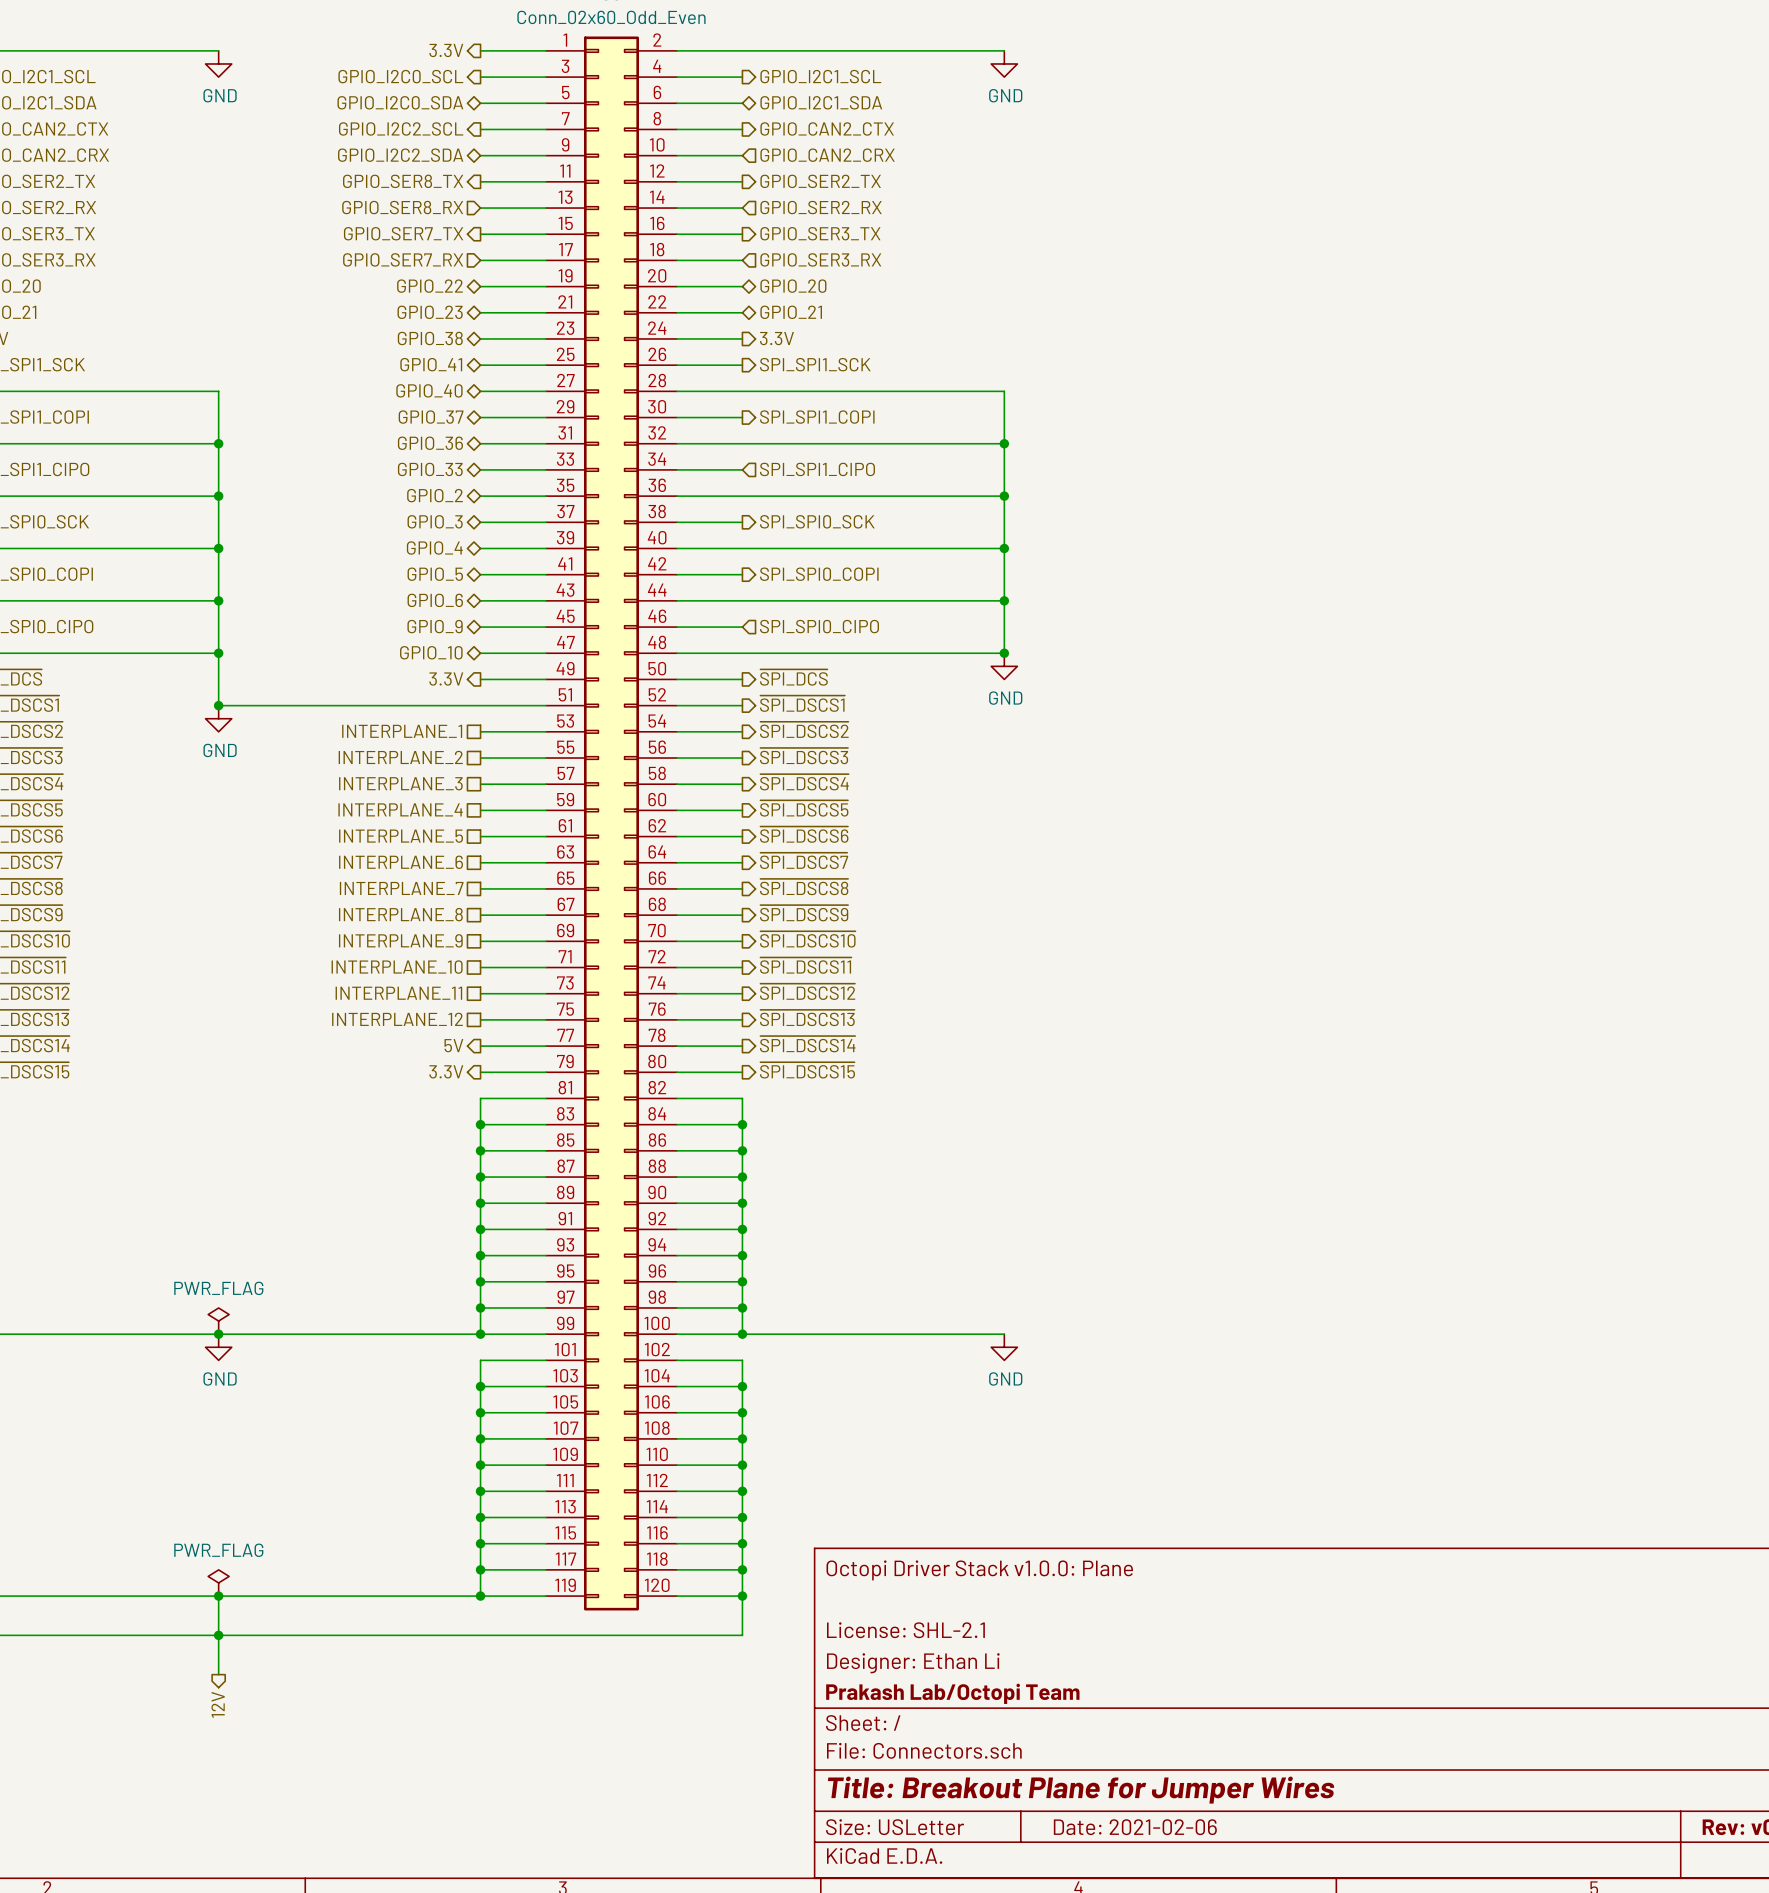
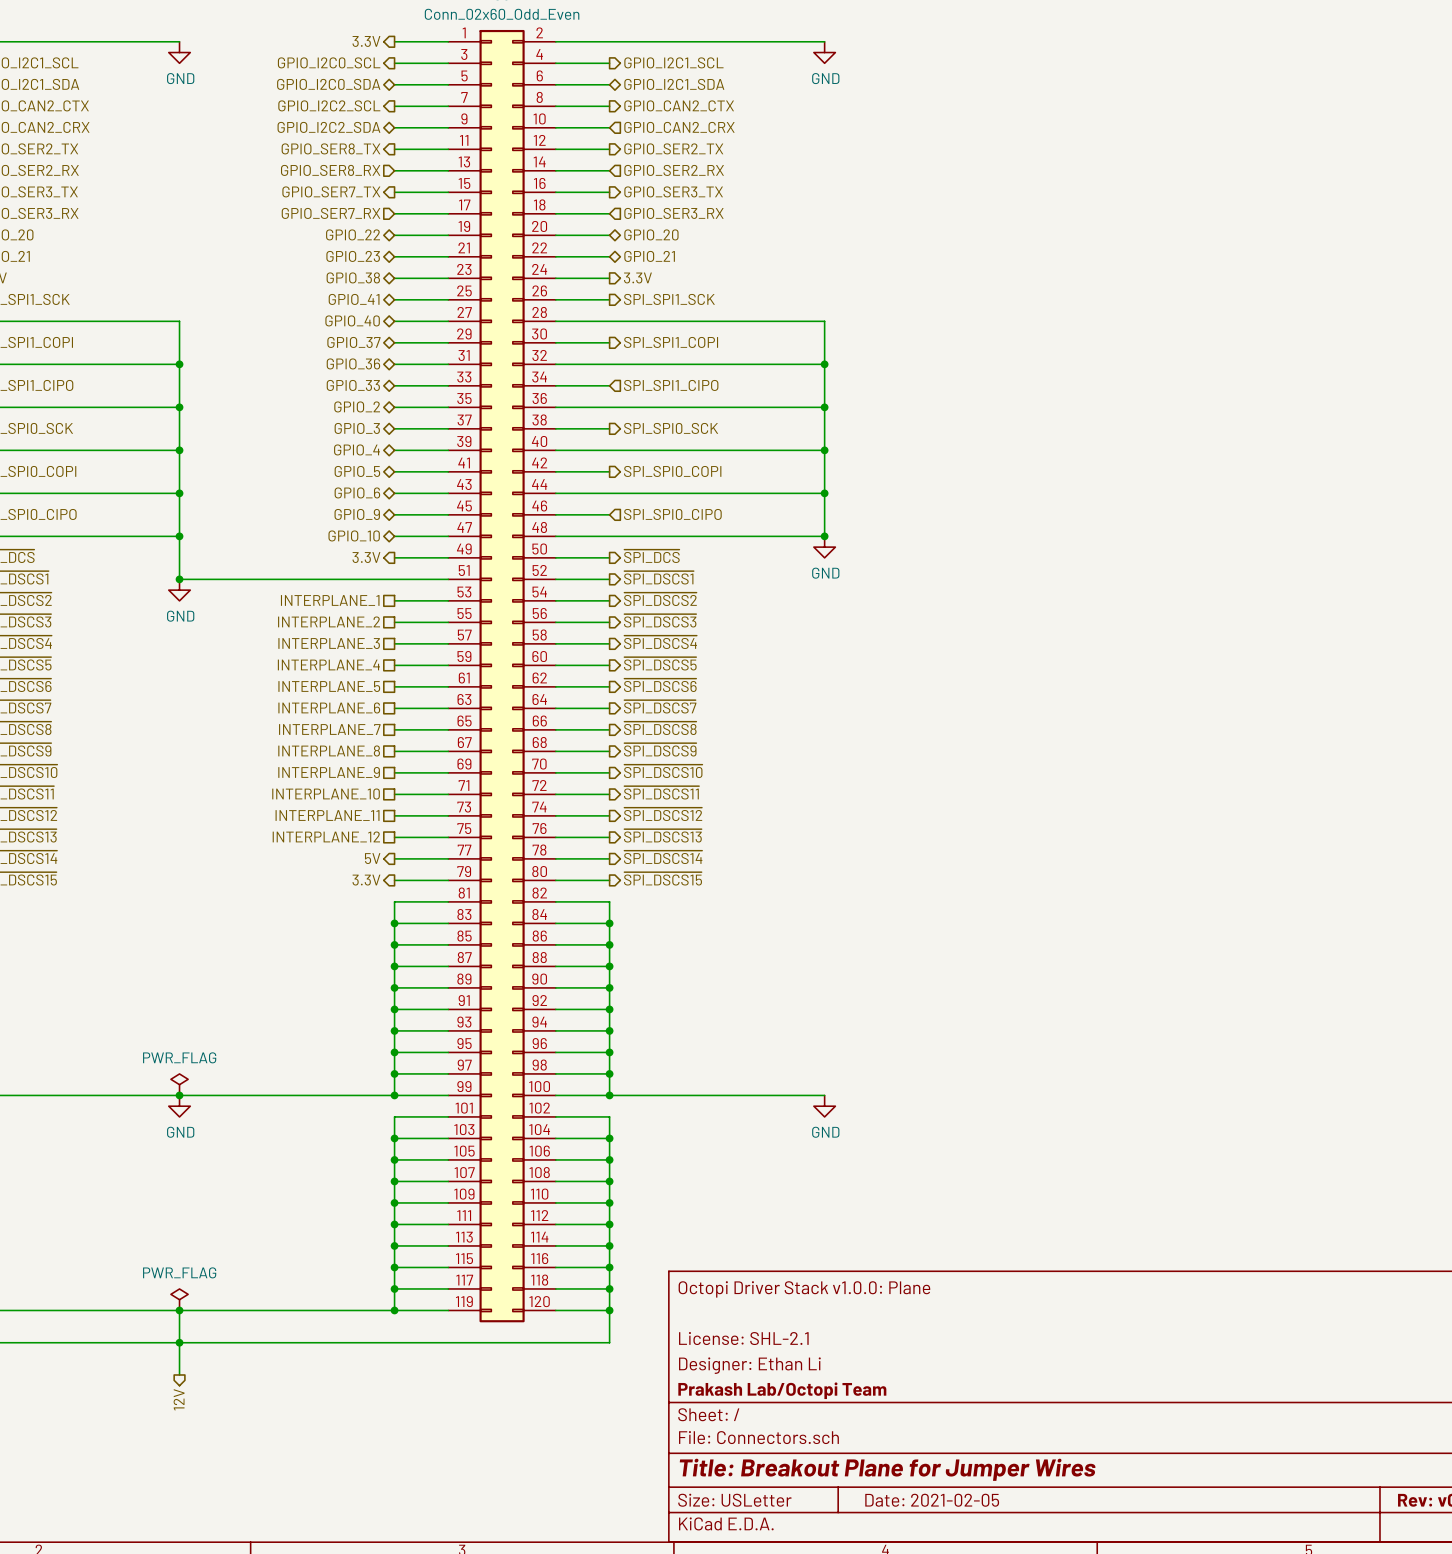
title block: Date: 2021-02-06 (1135, 1827) -> Date: 2021-02-05 (932, 1500)

